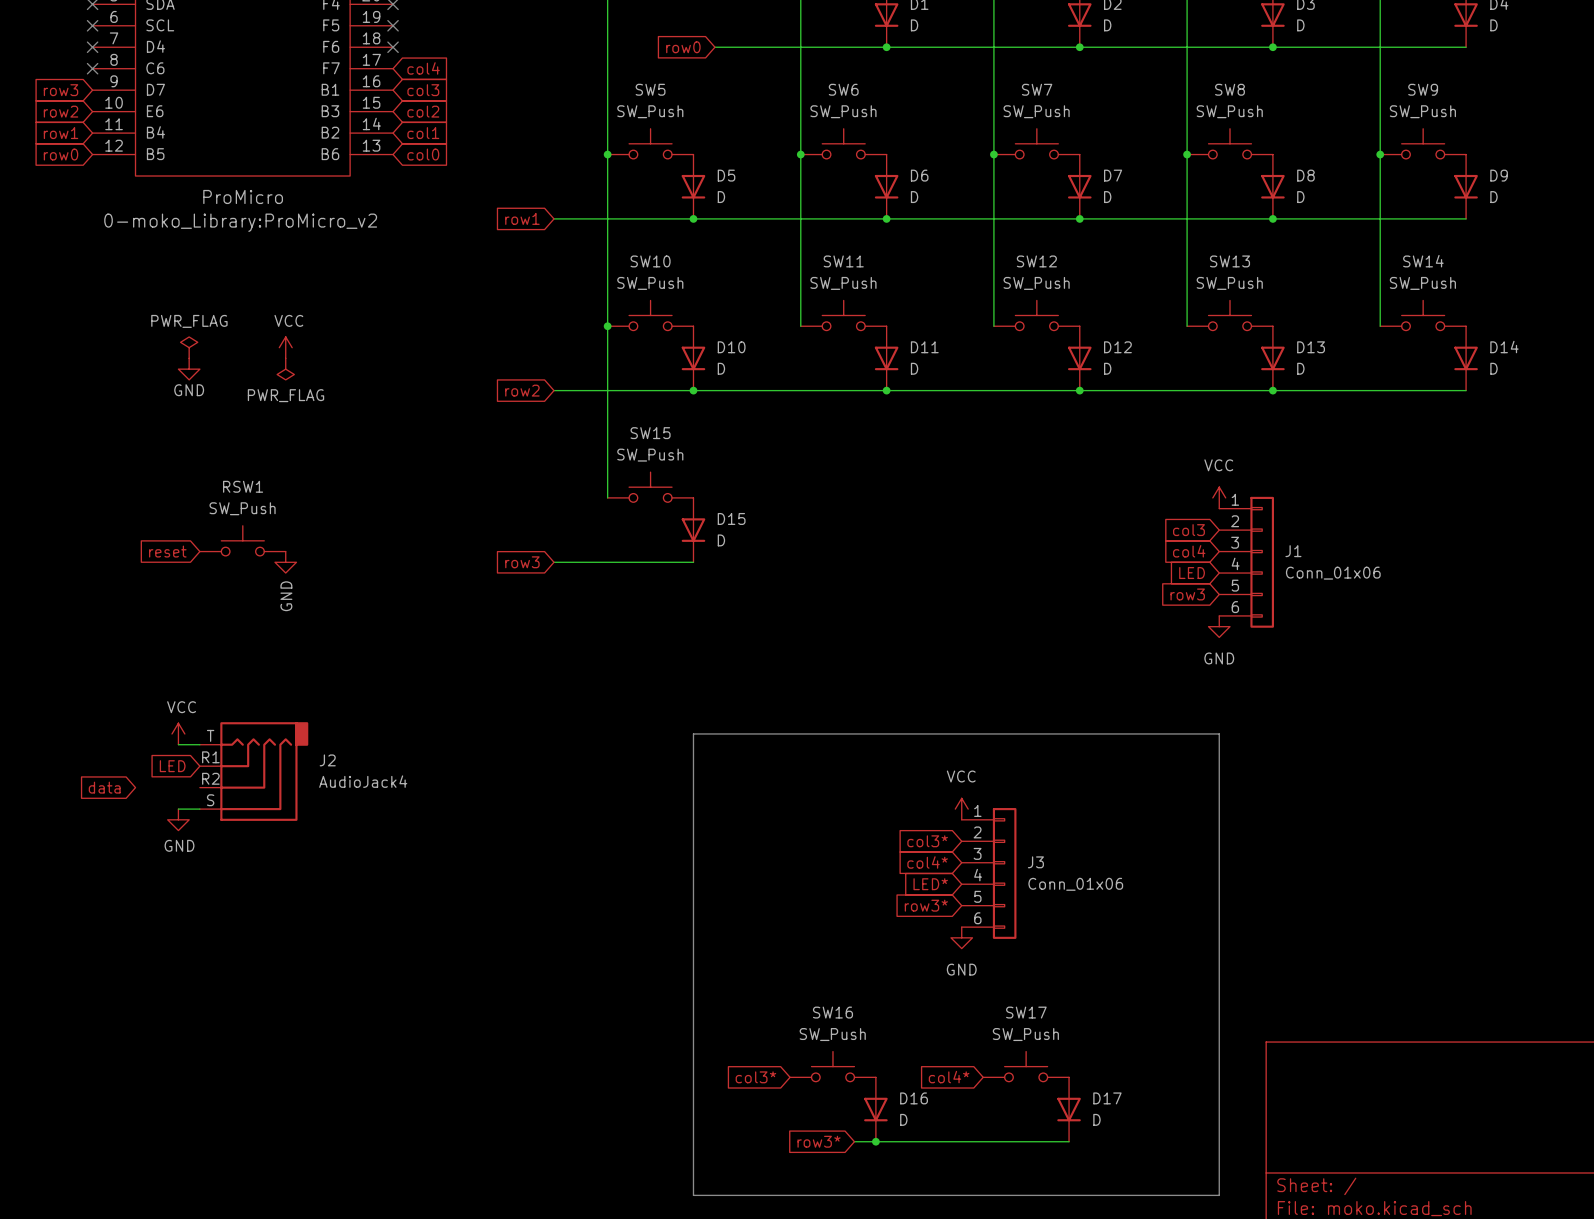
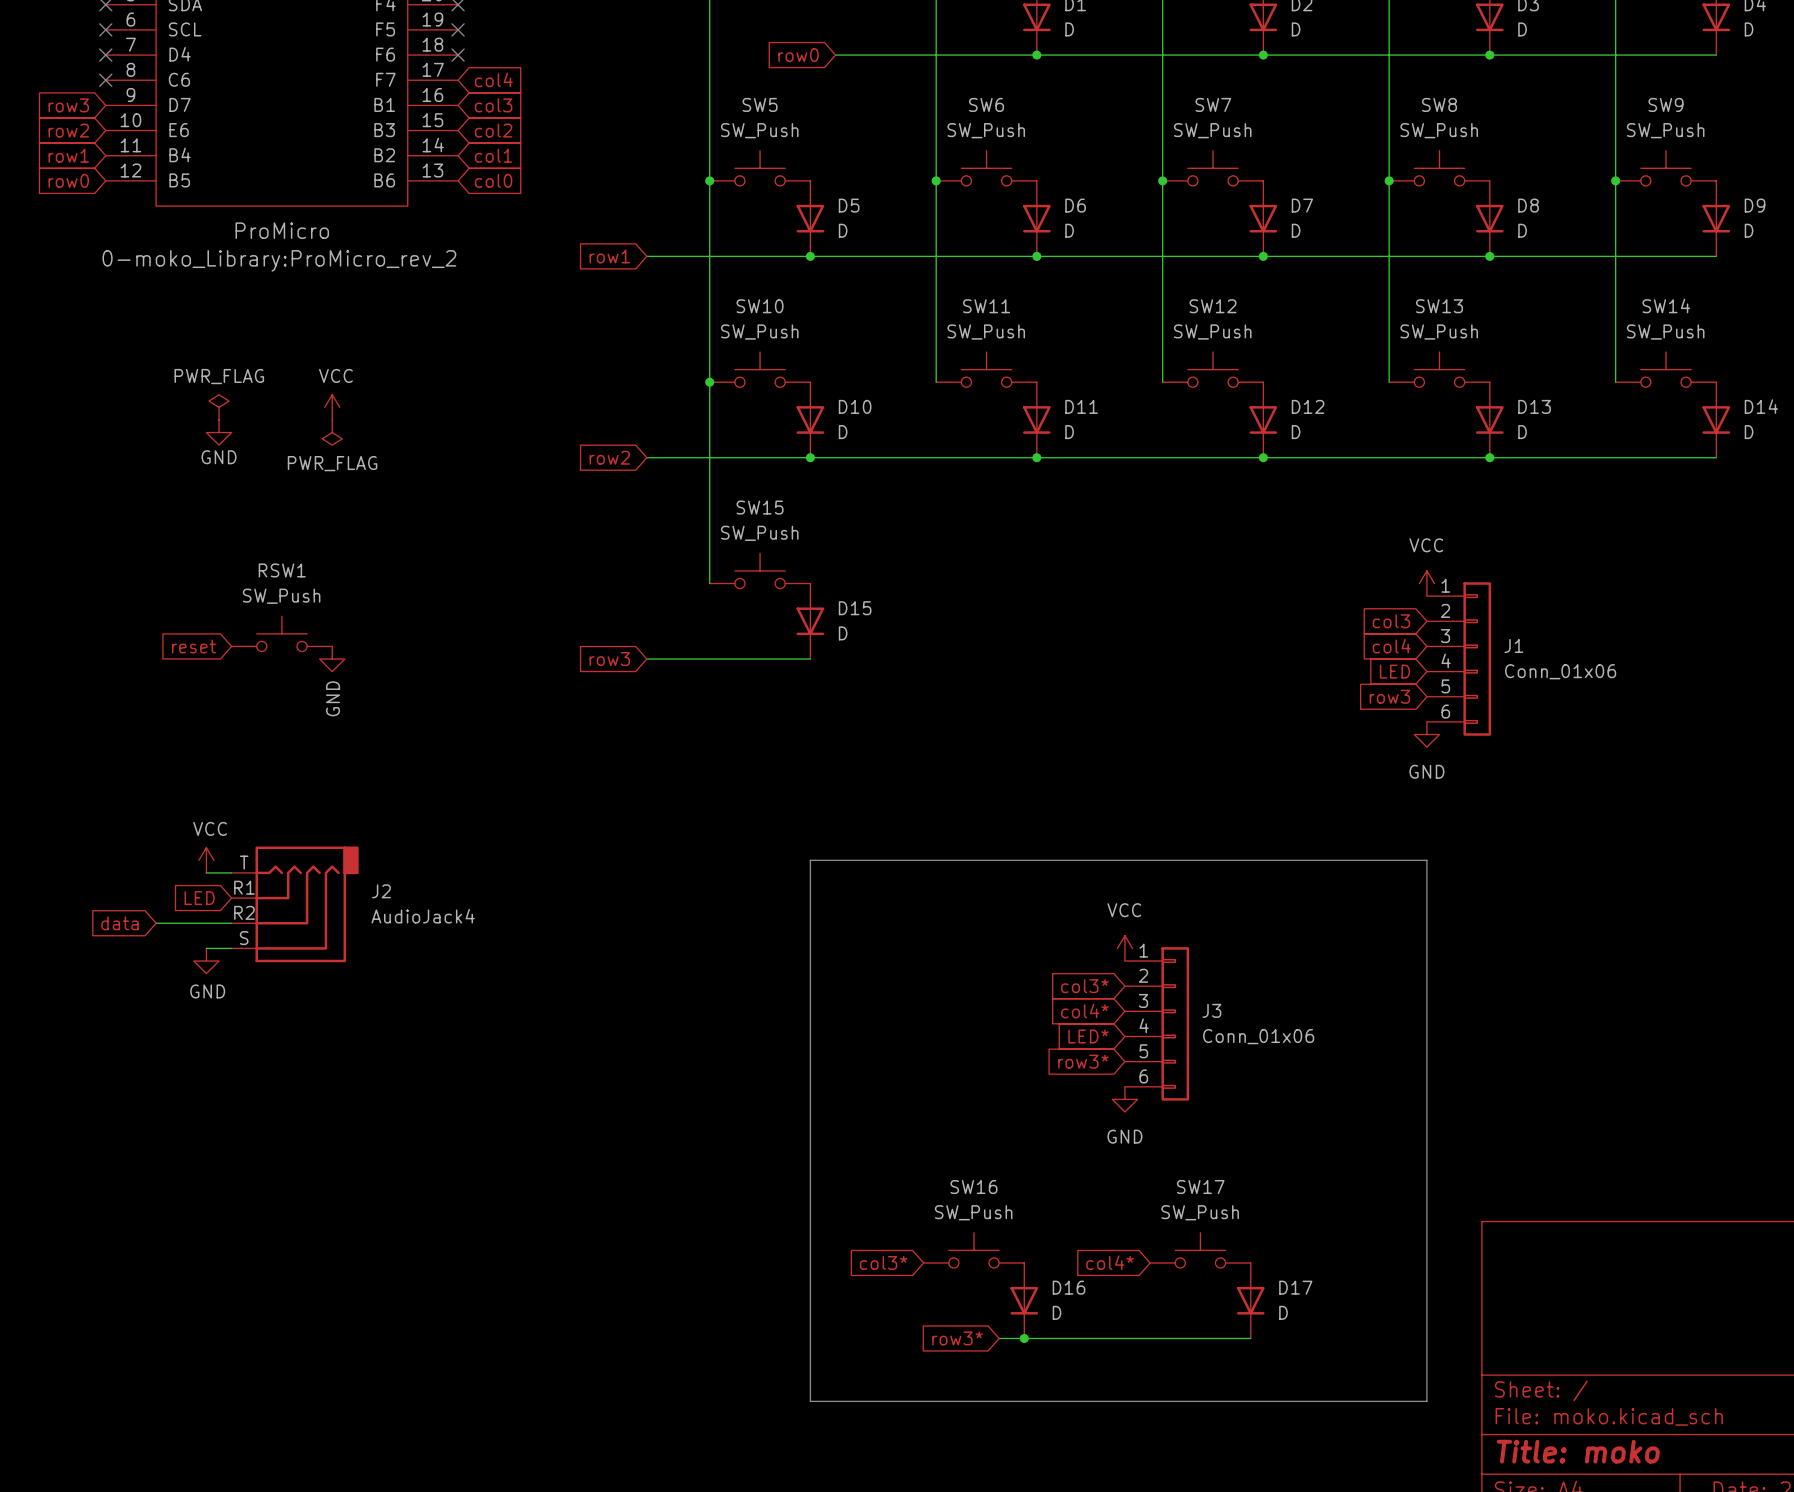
part text: 0-moko_Library:ProMicro_v2 (240, 222) -> 0-moko_Library:ProMicro_rev_2 (279, 260)
wire: none -> (156, 923) (231, 923)

